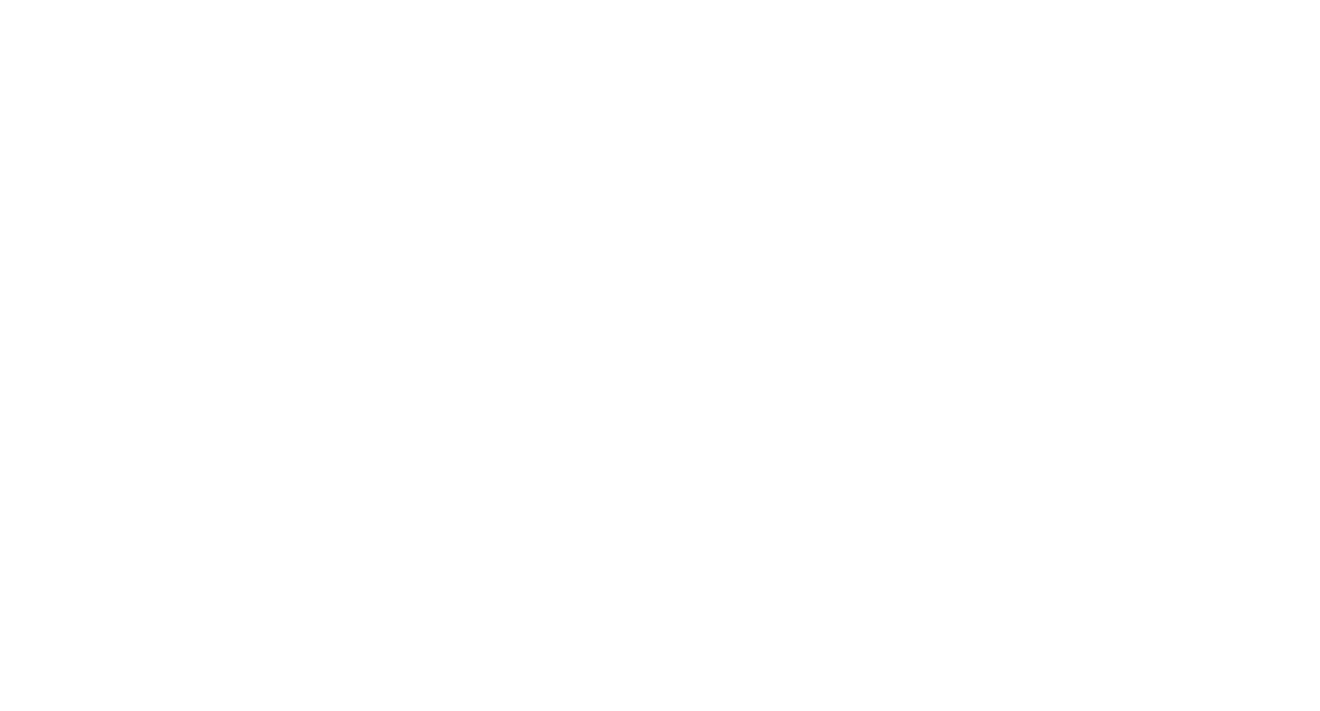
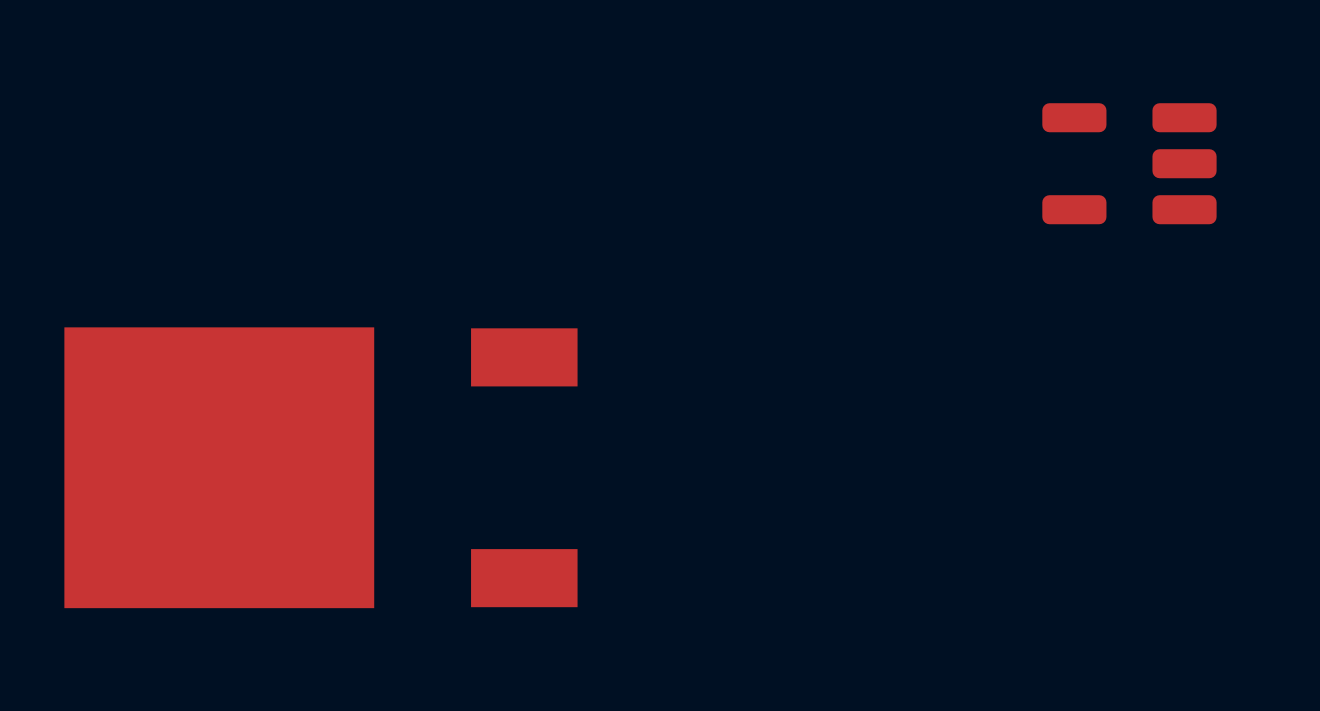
part: none -> (1129, 163)
part: none -> (320, 467)

